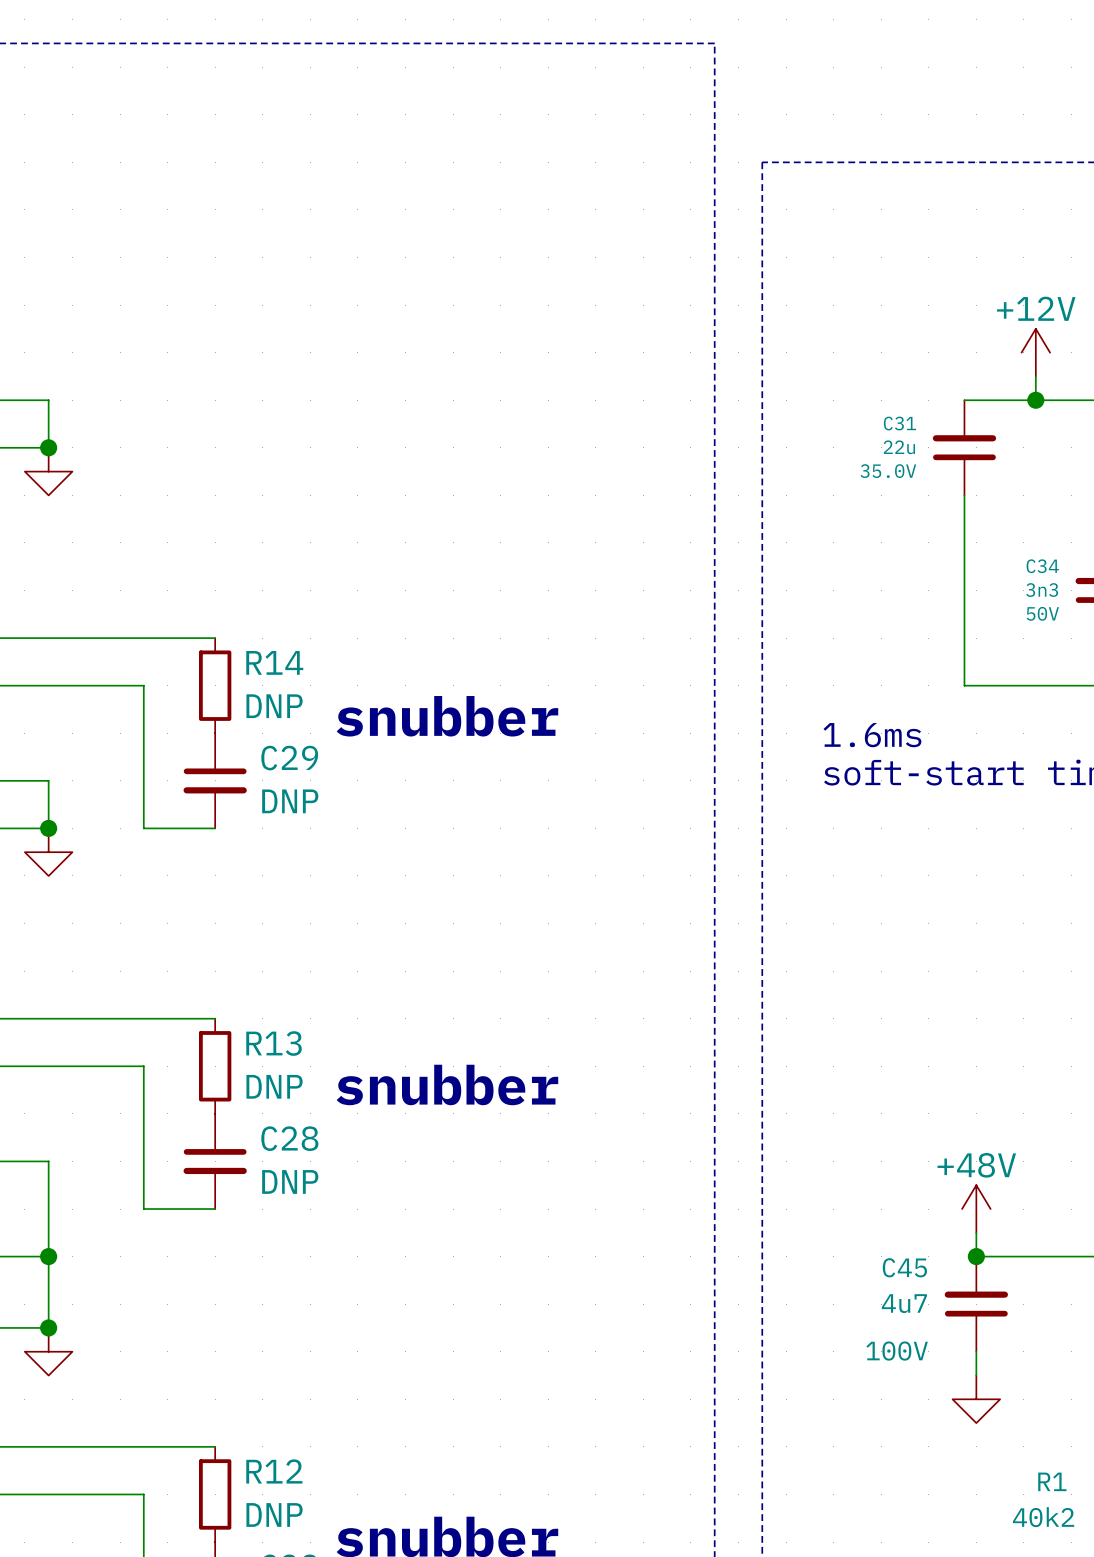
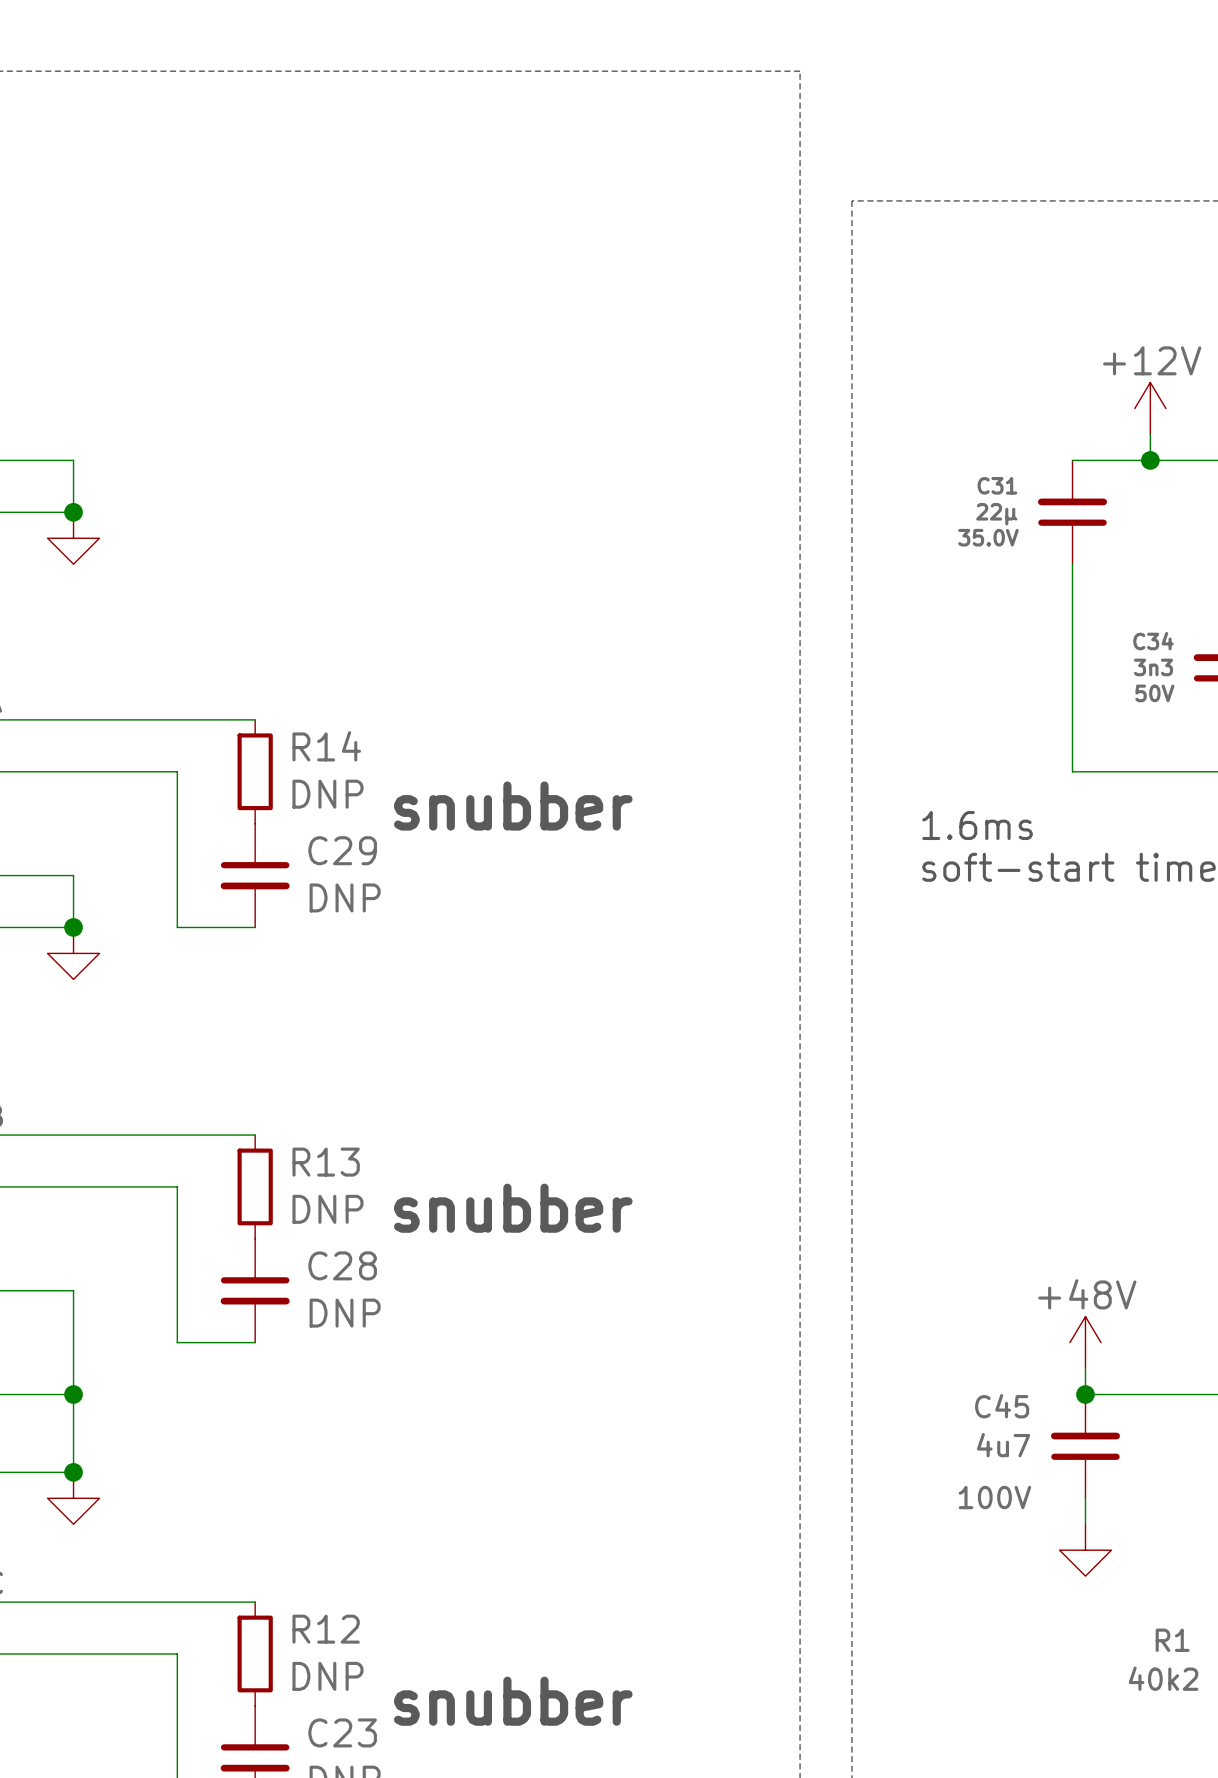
C31 value: 22u (899, 447) -> 22μ (996, 514)

